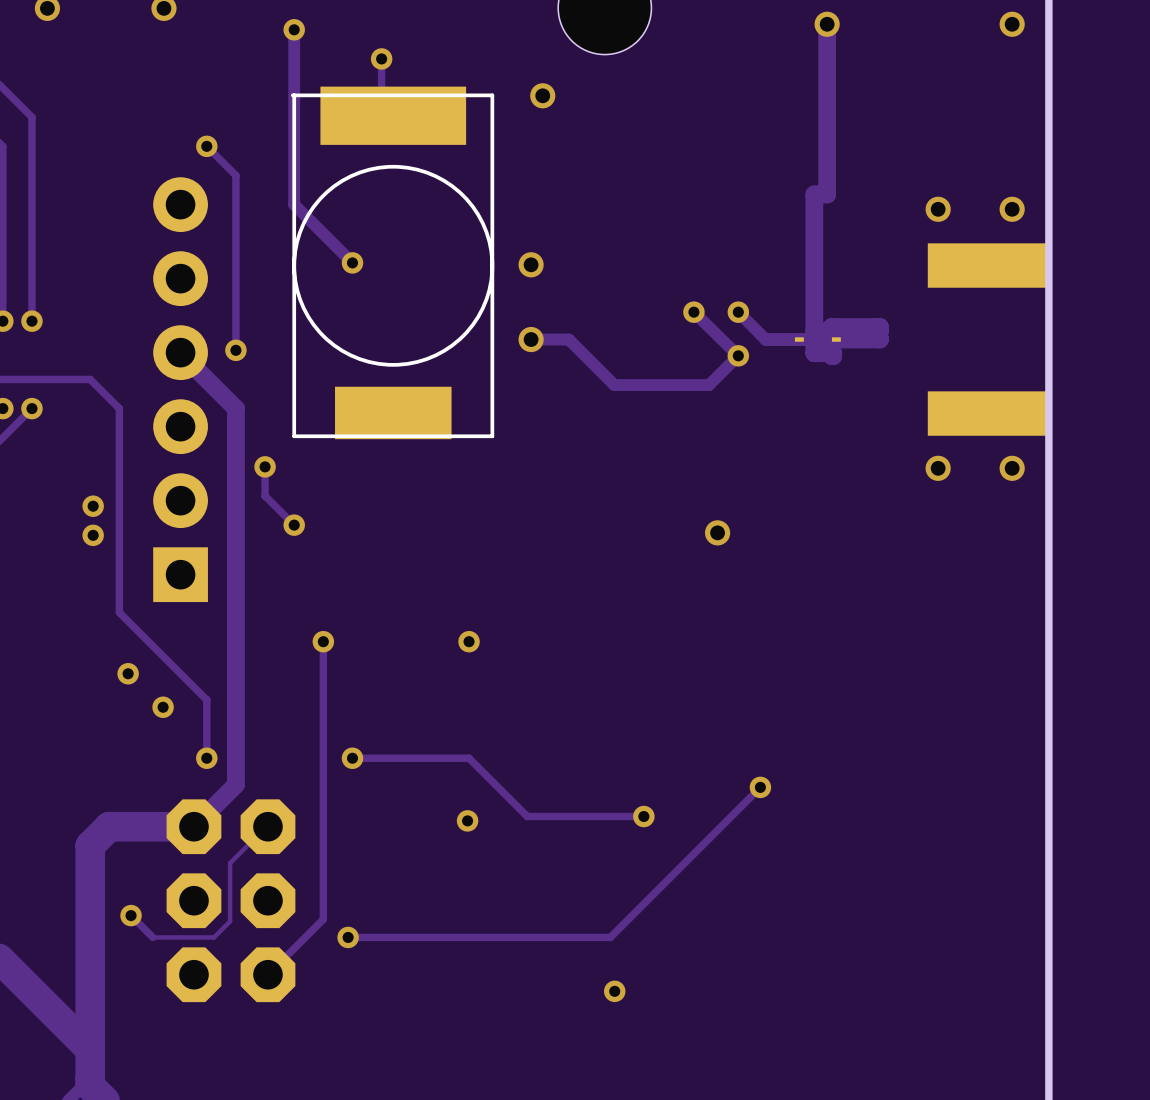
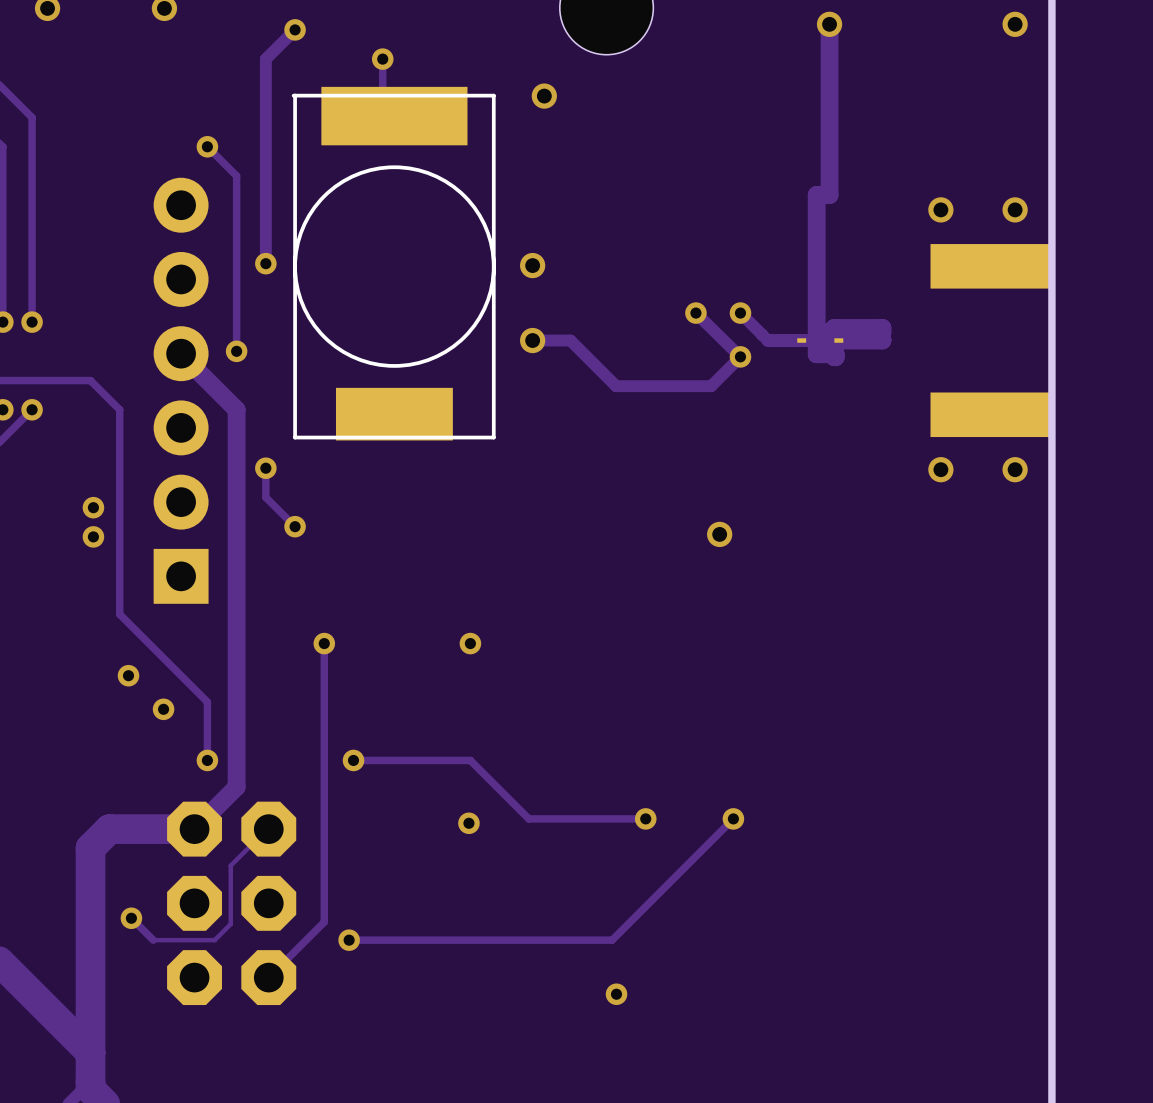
track: (294, 29) (294, 204) (352, 262) -> (295, 29) (265, 59) (265, 263)
via position: (352, 262) -> (265, 263)
track: (760, 787) (731, 816) -> none
via position: (760, 787) -> (733, 818)

